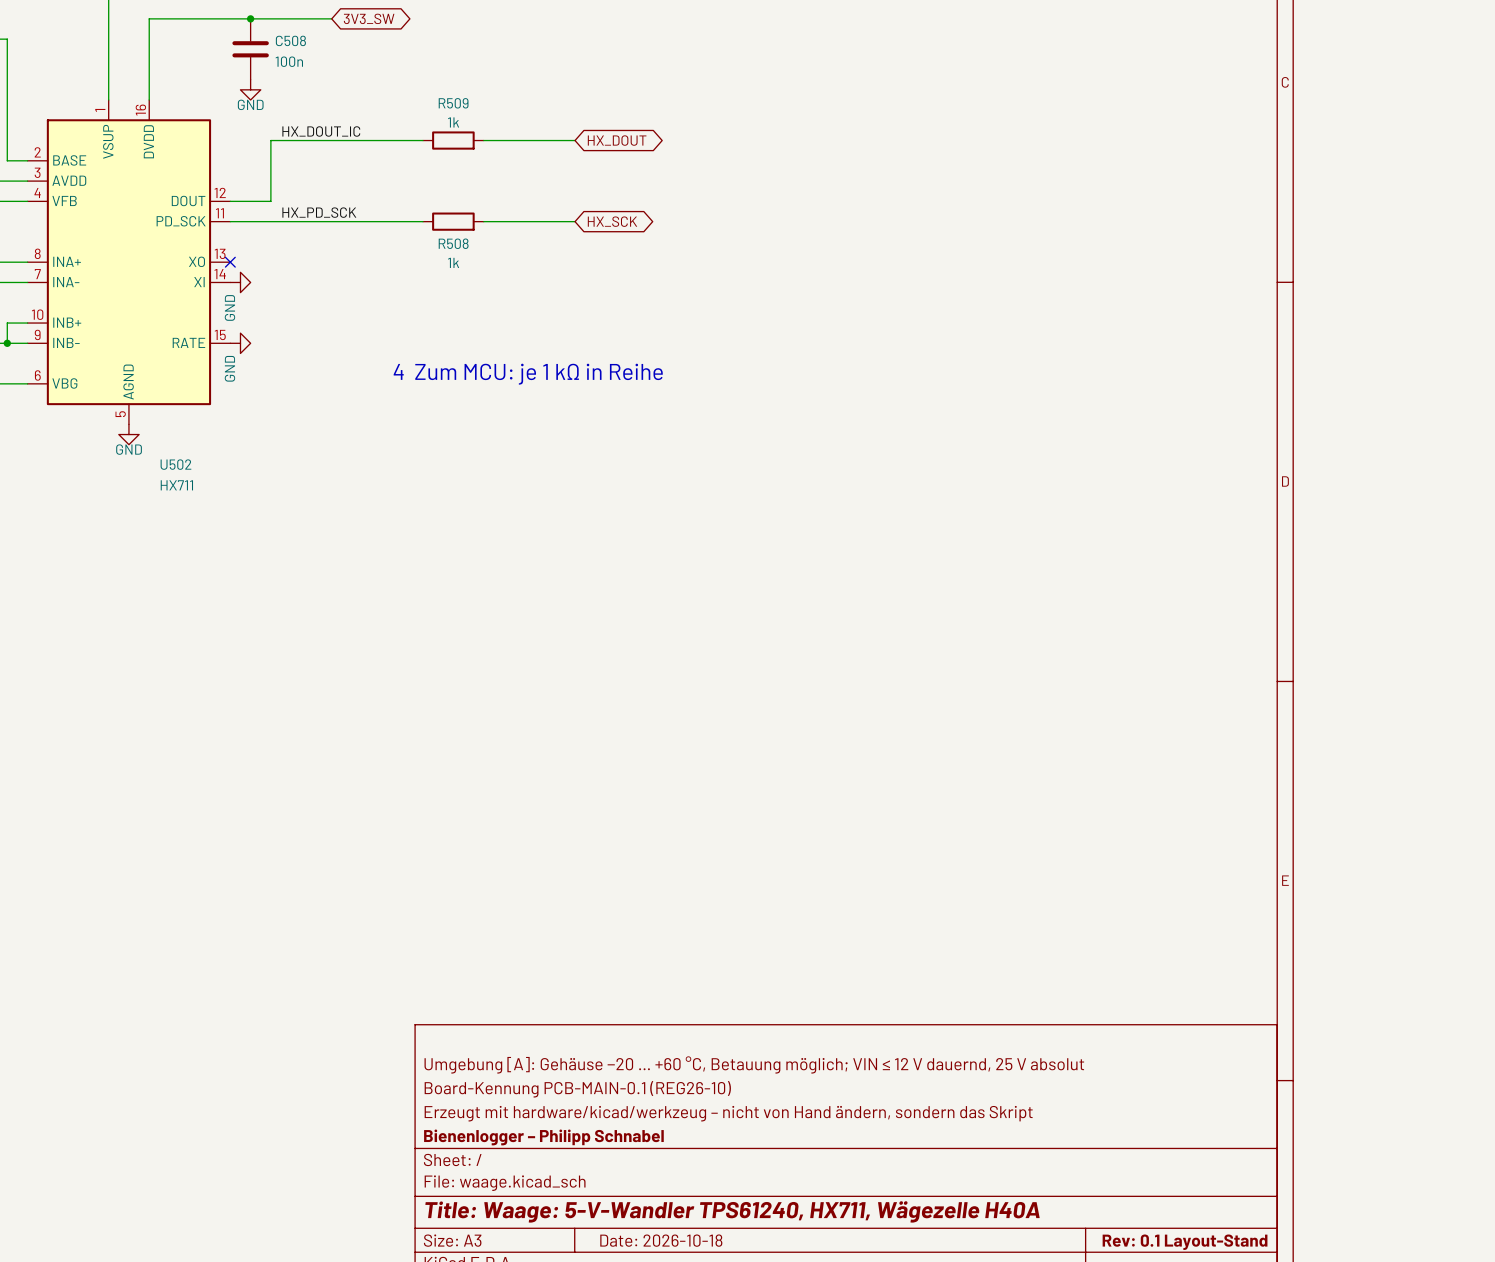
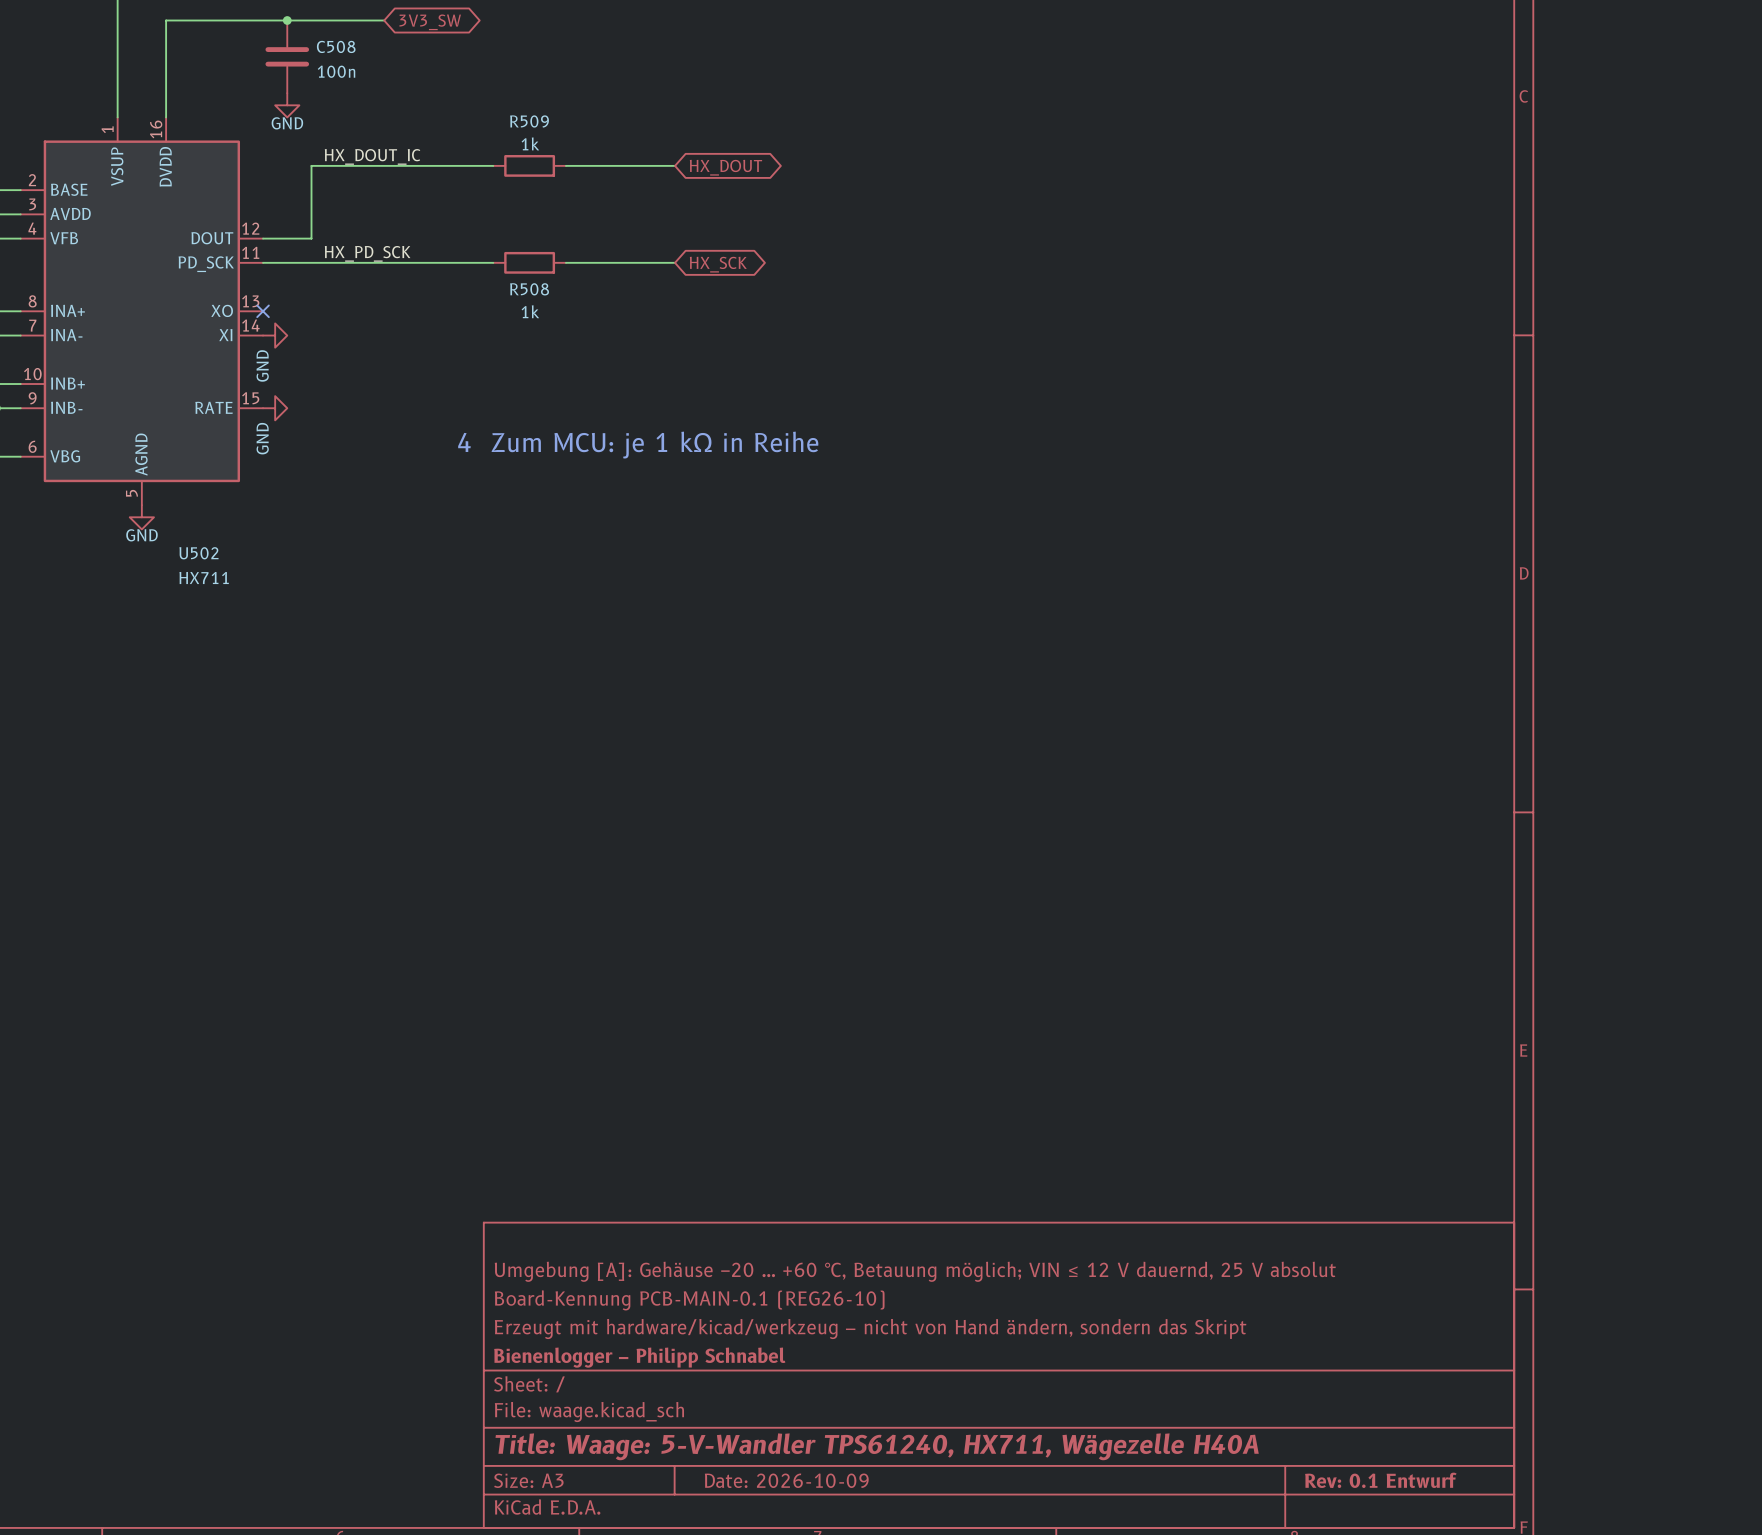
title block: Date: 2026-10-18 (661, 1240) -> Date: 2026-10-09 (786, 1480)
title block: Rev: 0.1 Layout-Stand (1185, 1242) -> Rev: 0.1 Entwurf (1380, 1480)

